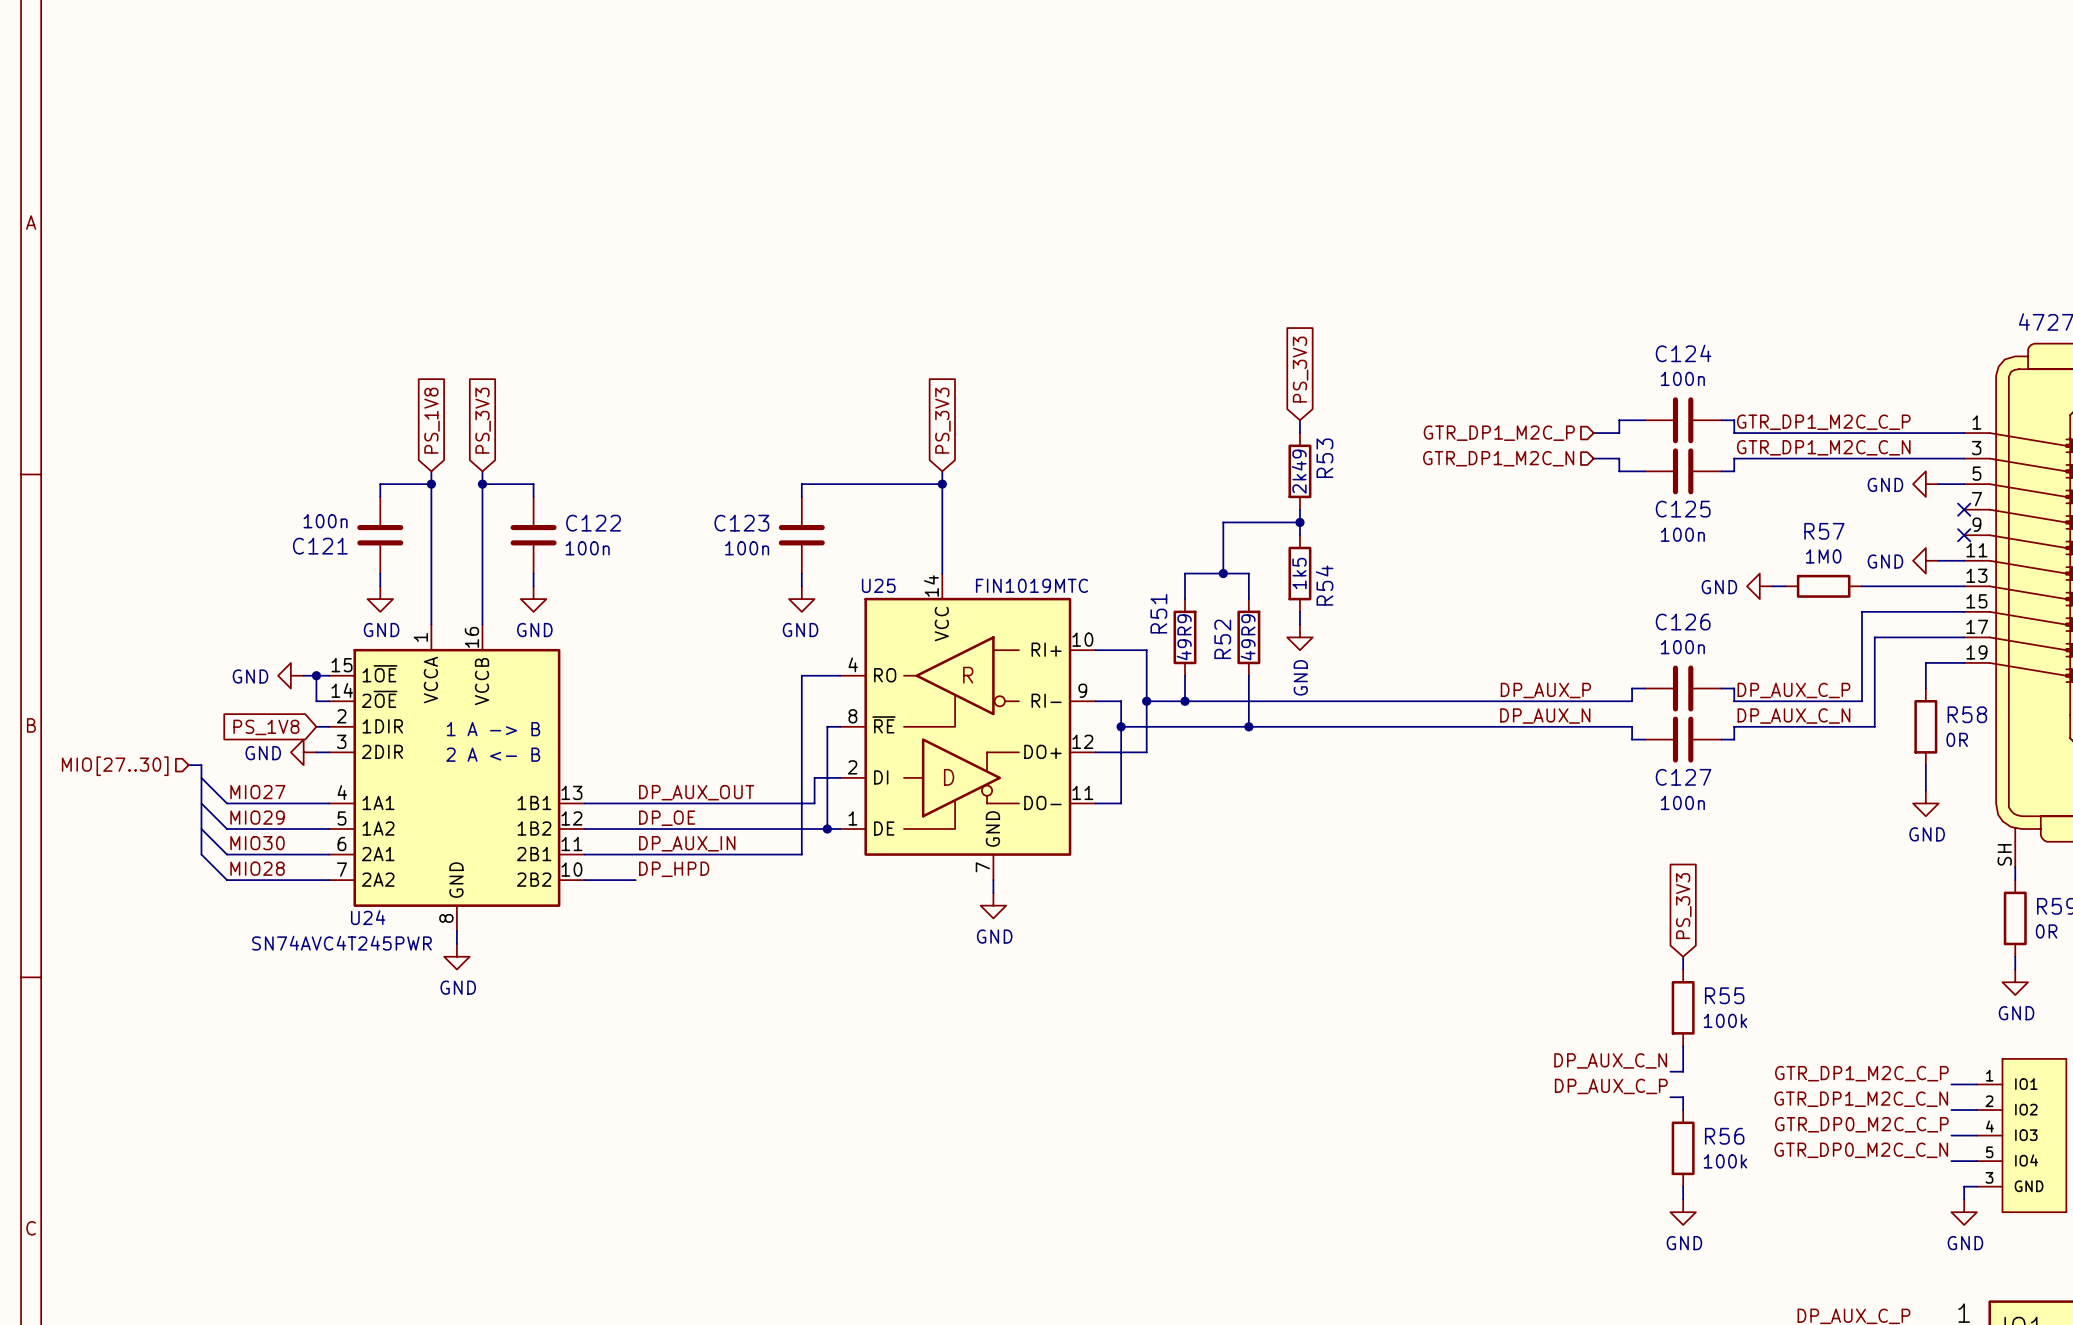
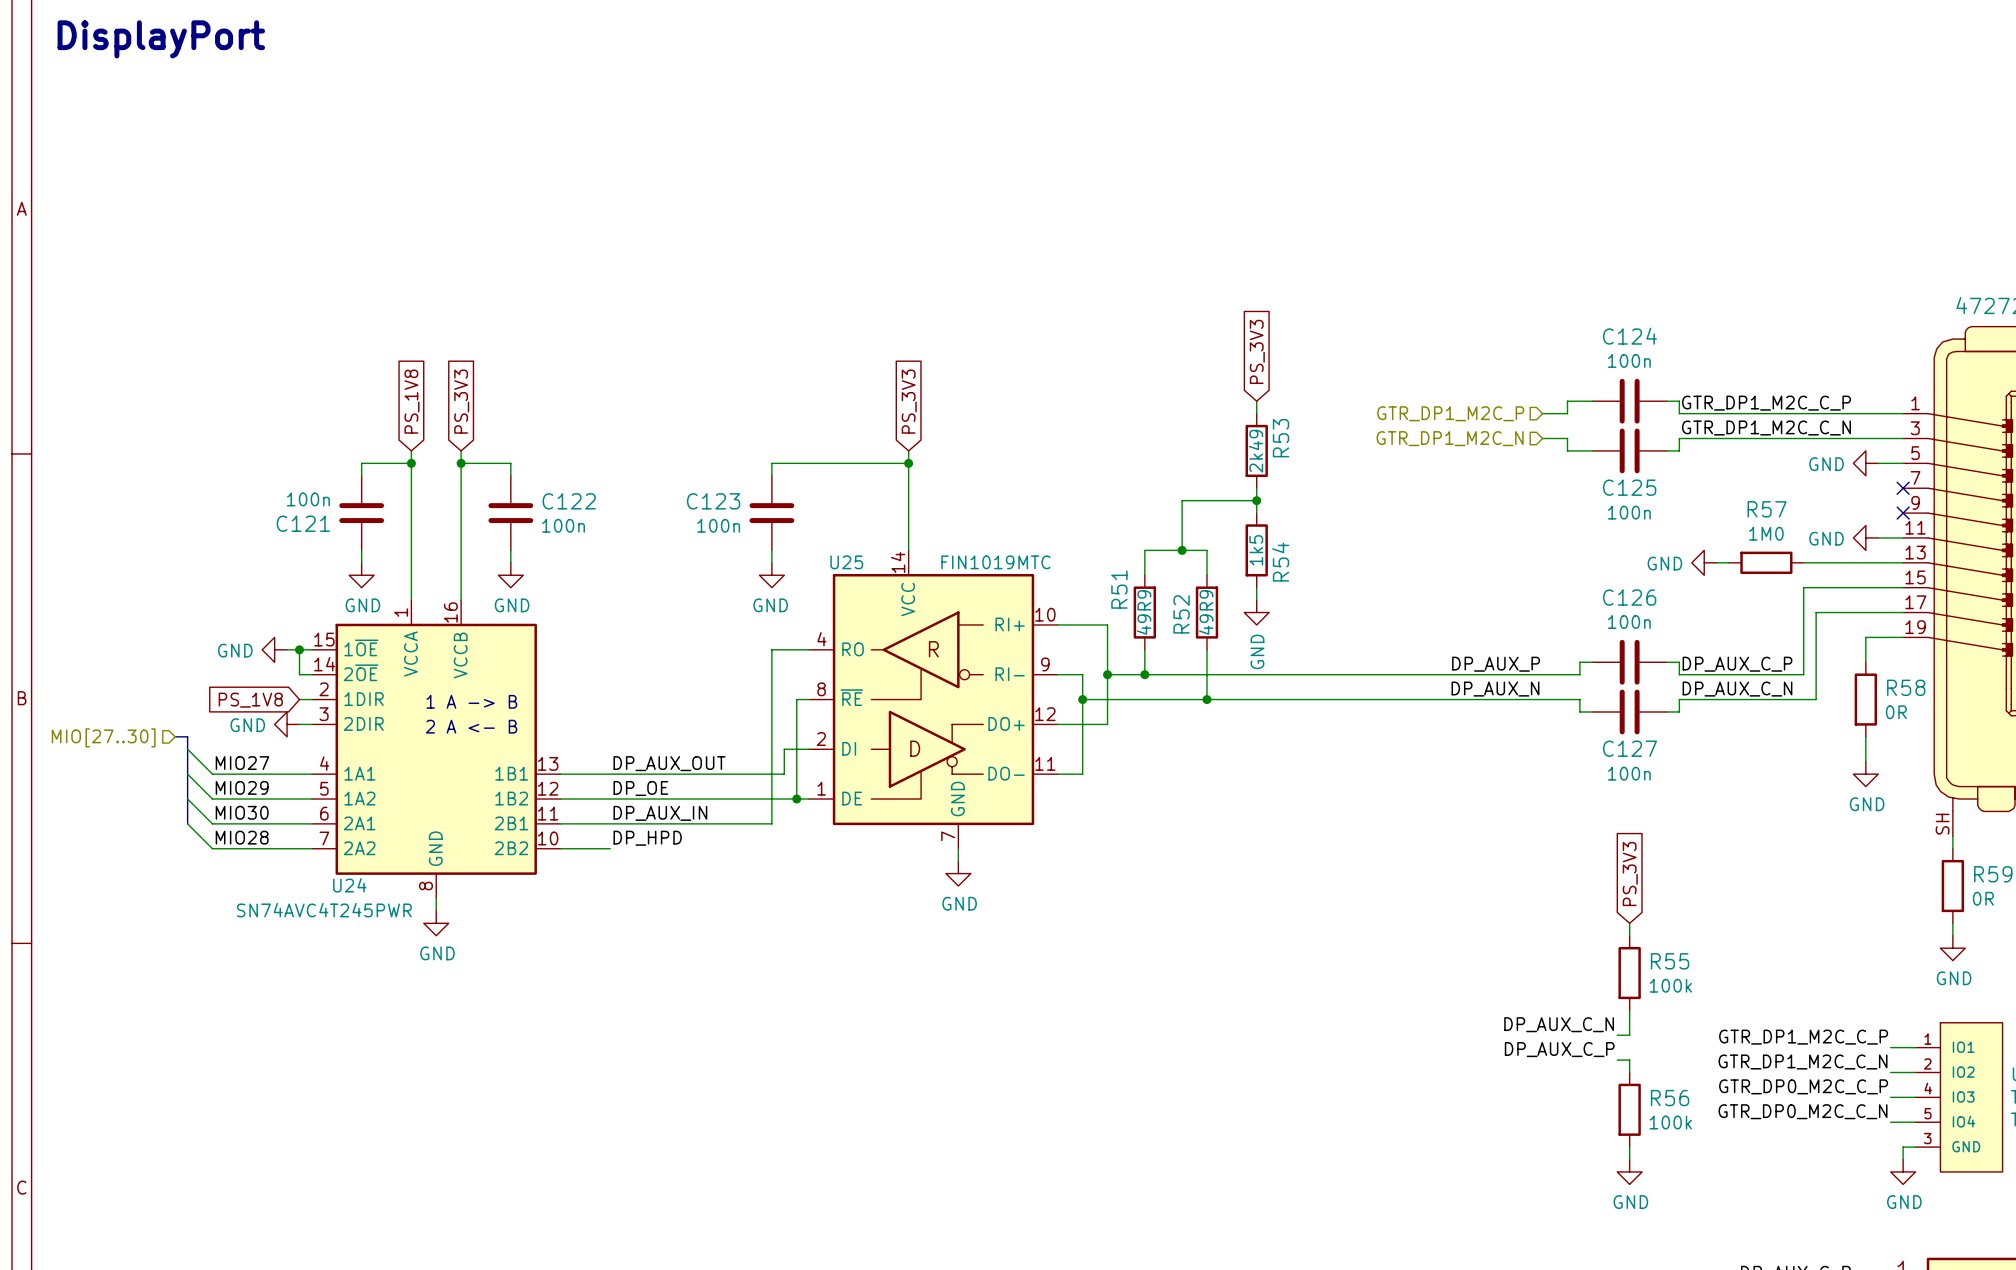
text: none -> DisplayPort (161, 39)

